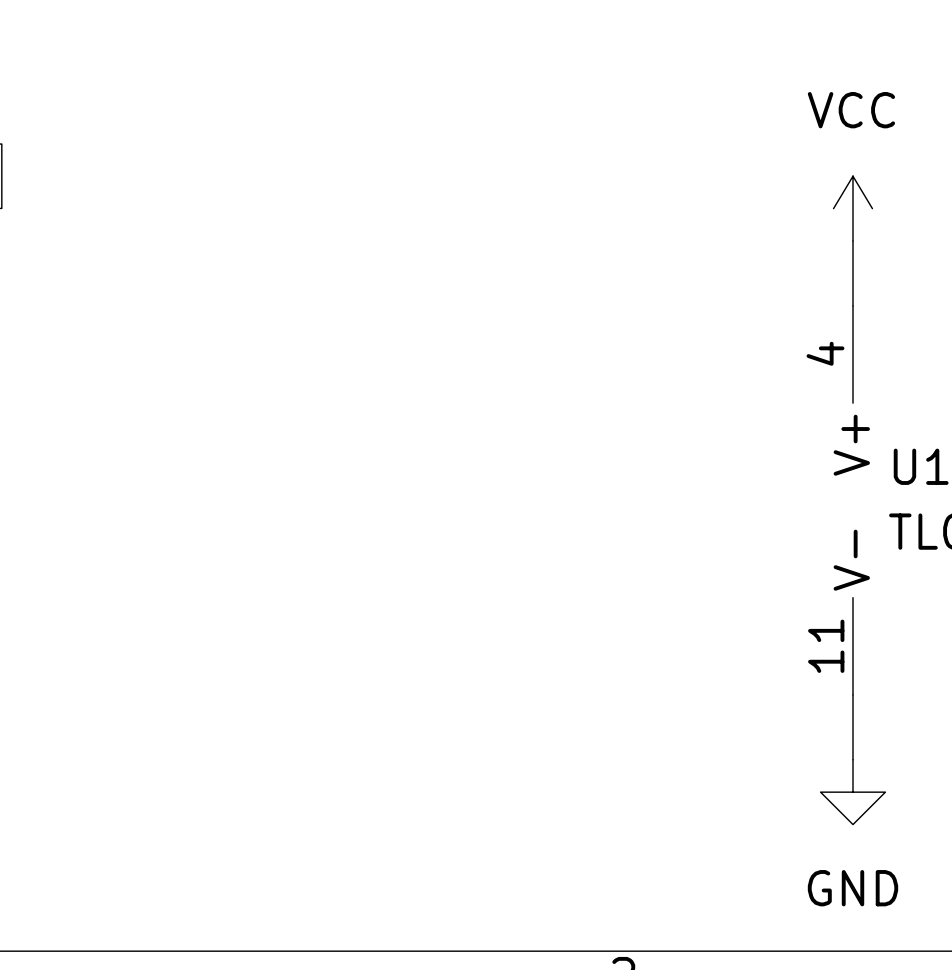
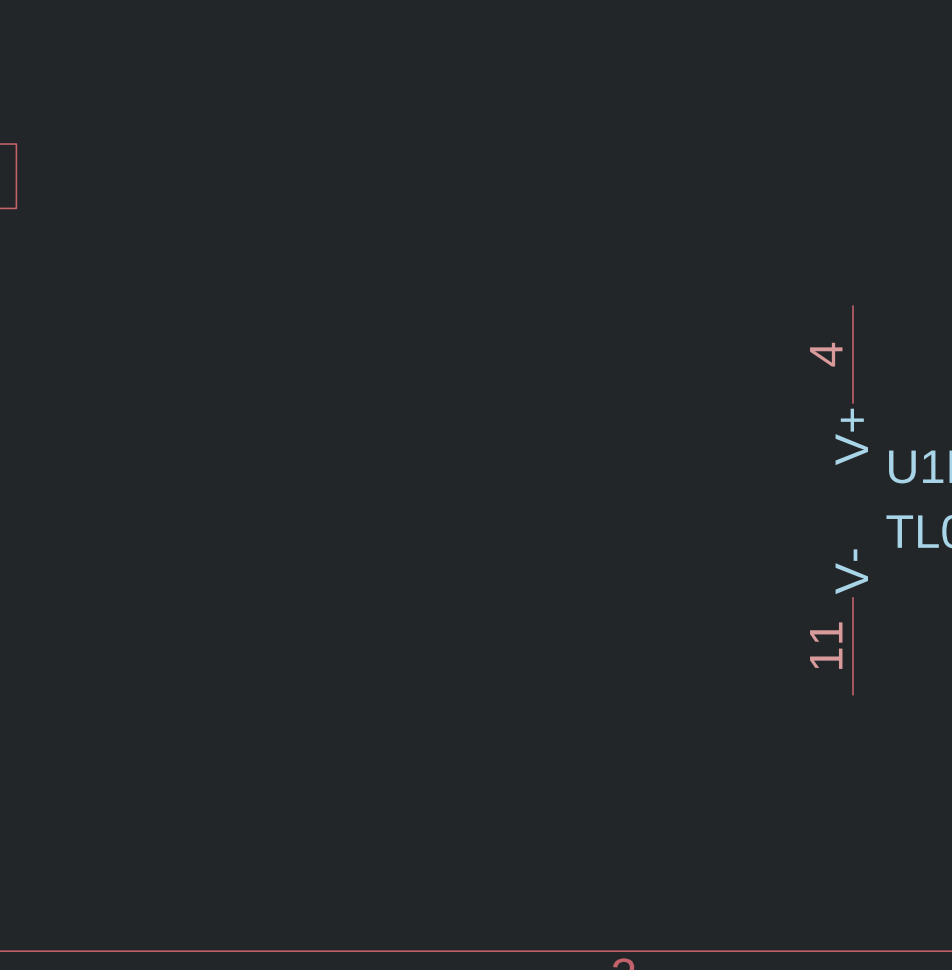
power symbol: VCC (852, 208) -> none
wire: (852, 241) (852, 305) -> none
wire: (852, 694) (852, 759) -> none
power symbol: GND (852, 792) -> none

